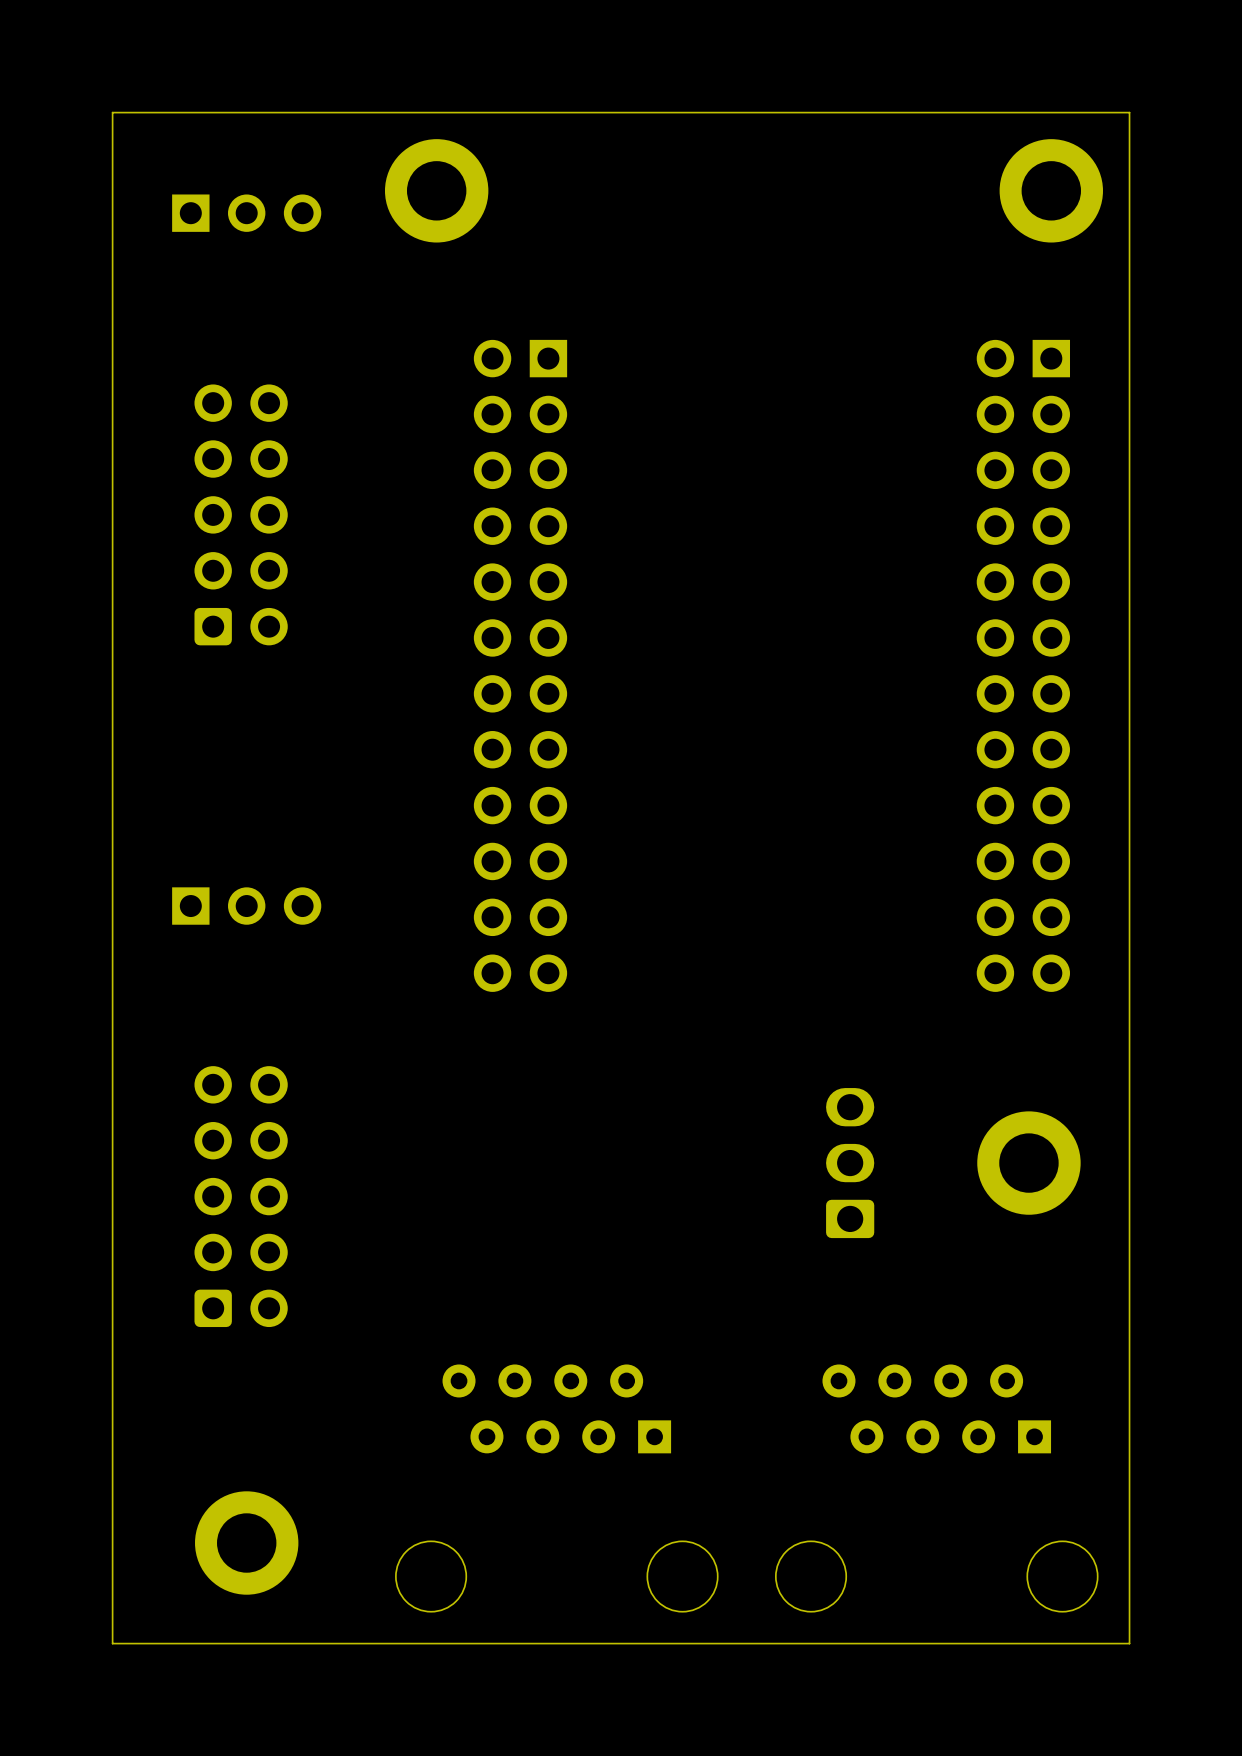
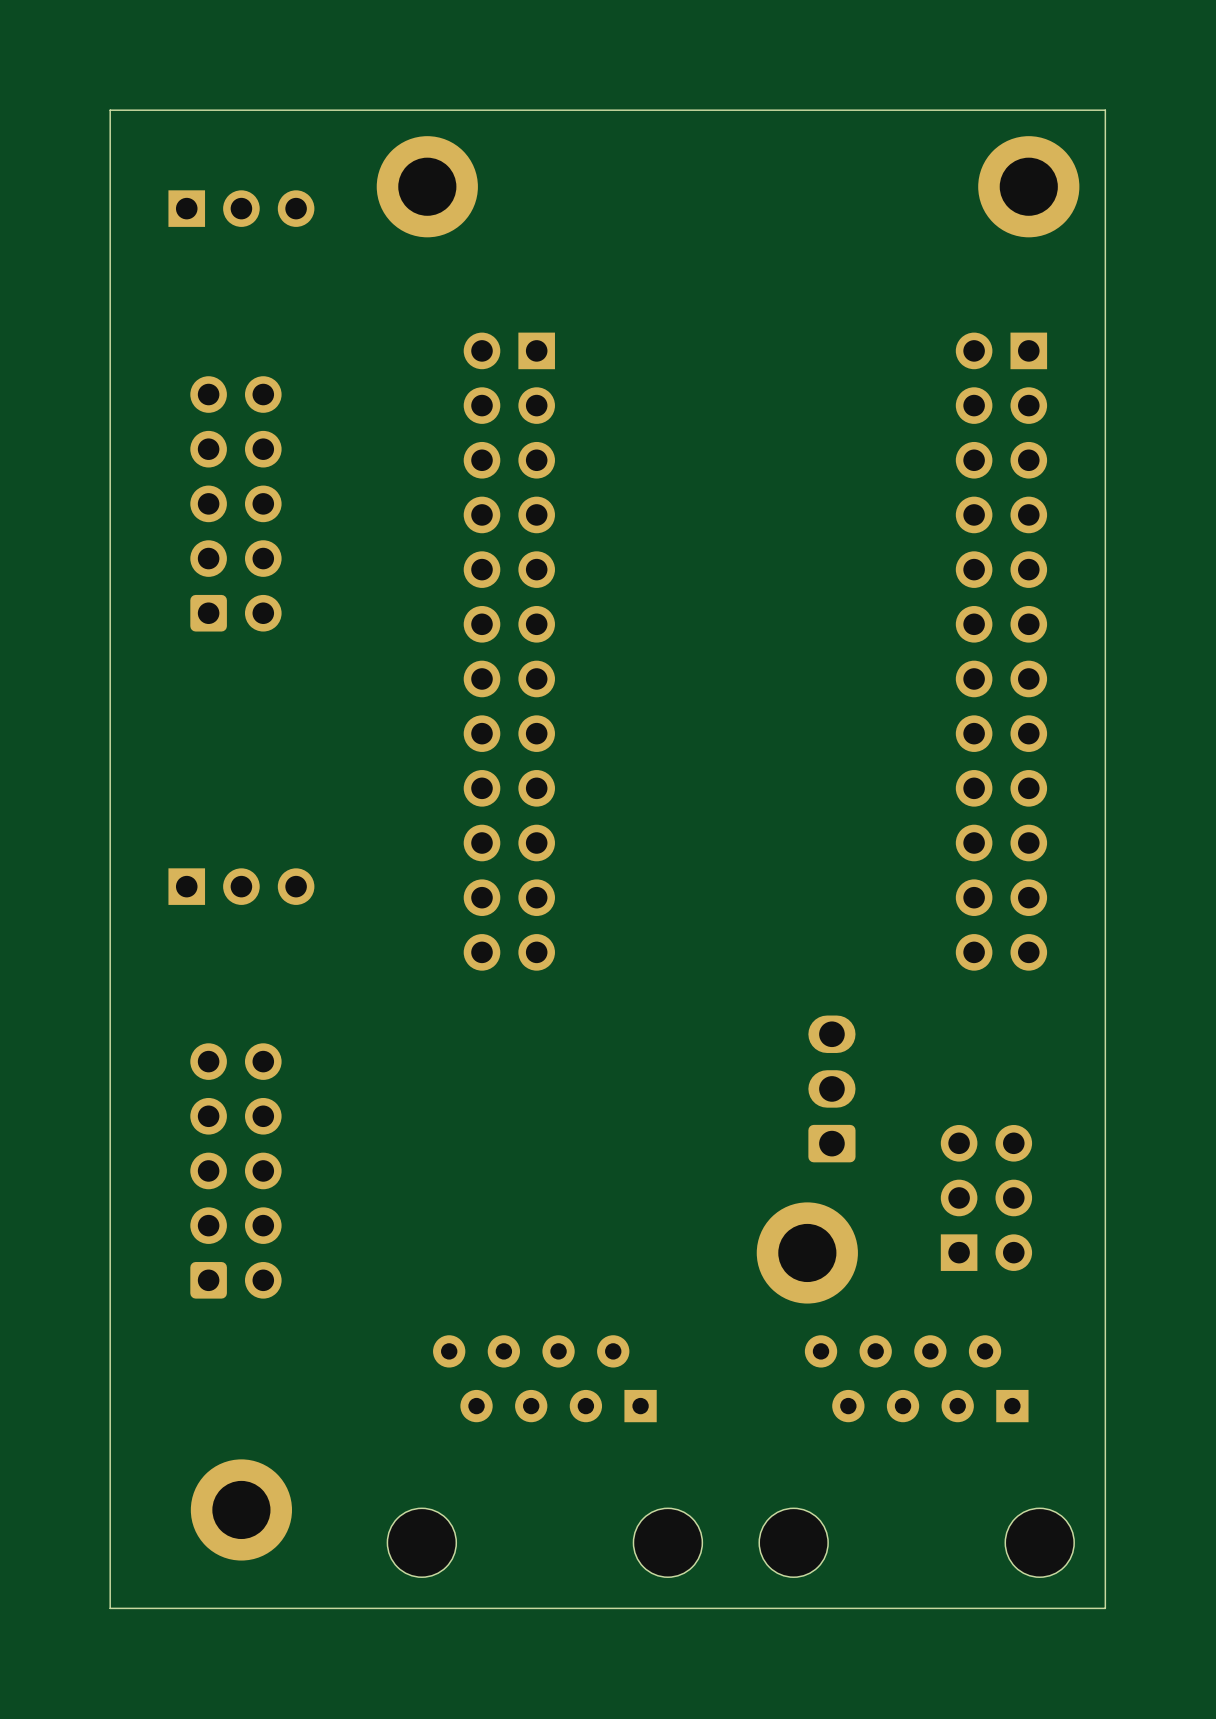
part position: (850, 1163) -> (831, 1088)
part position: (1028, 1163) -> (807, 1252)
part: none -> (986, 1197)

